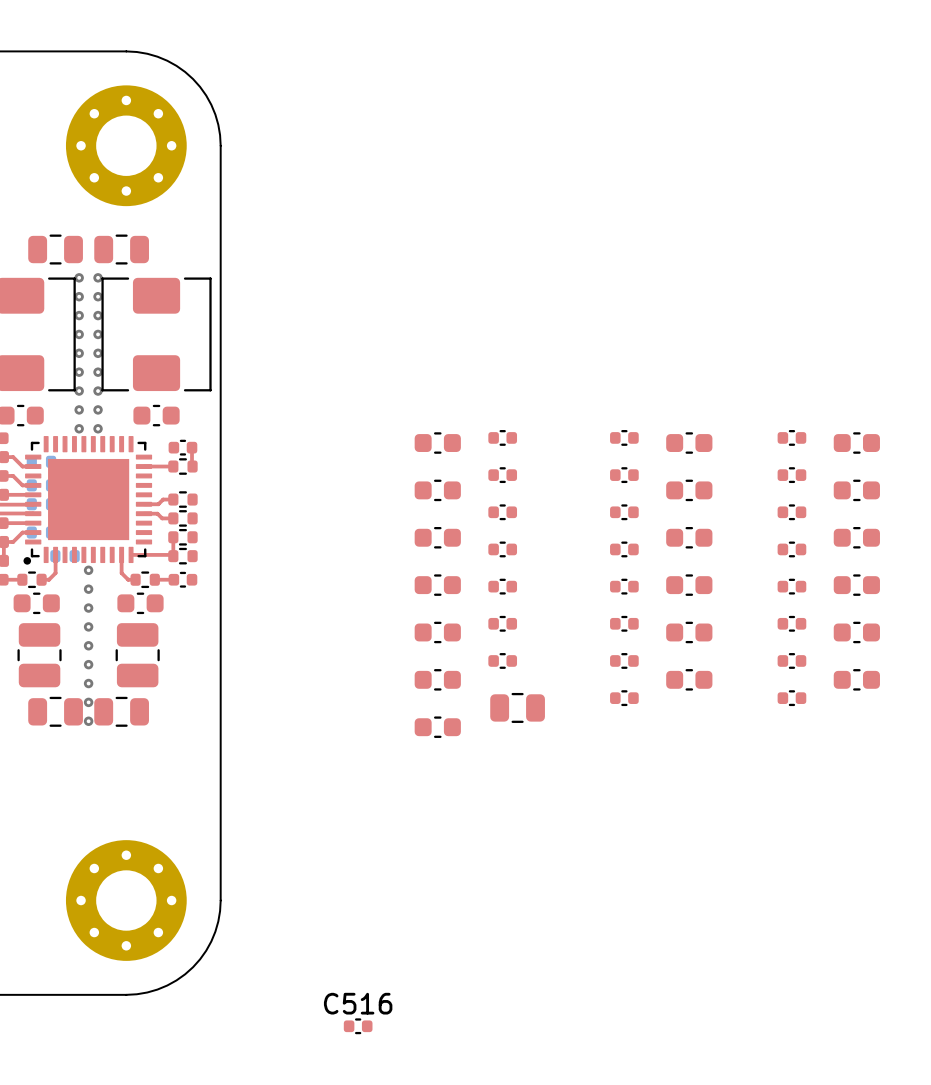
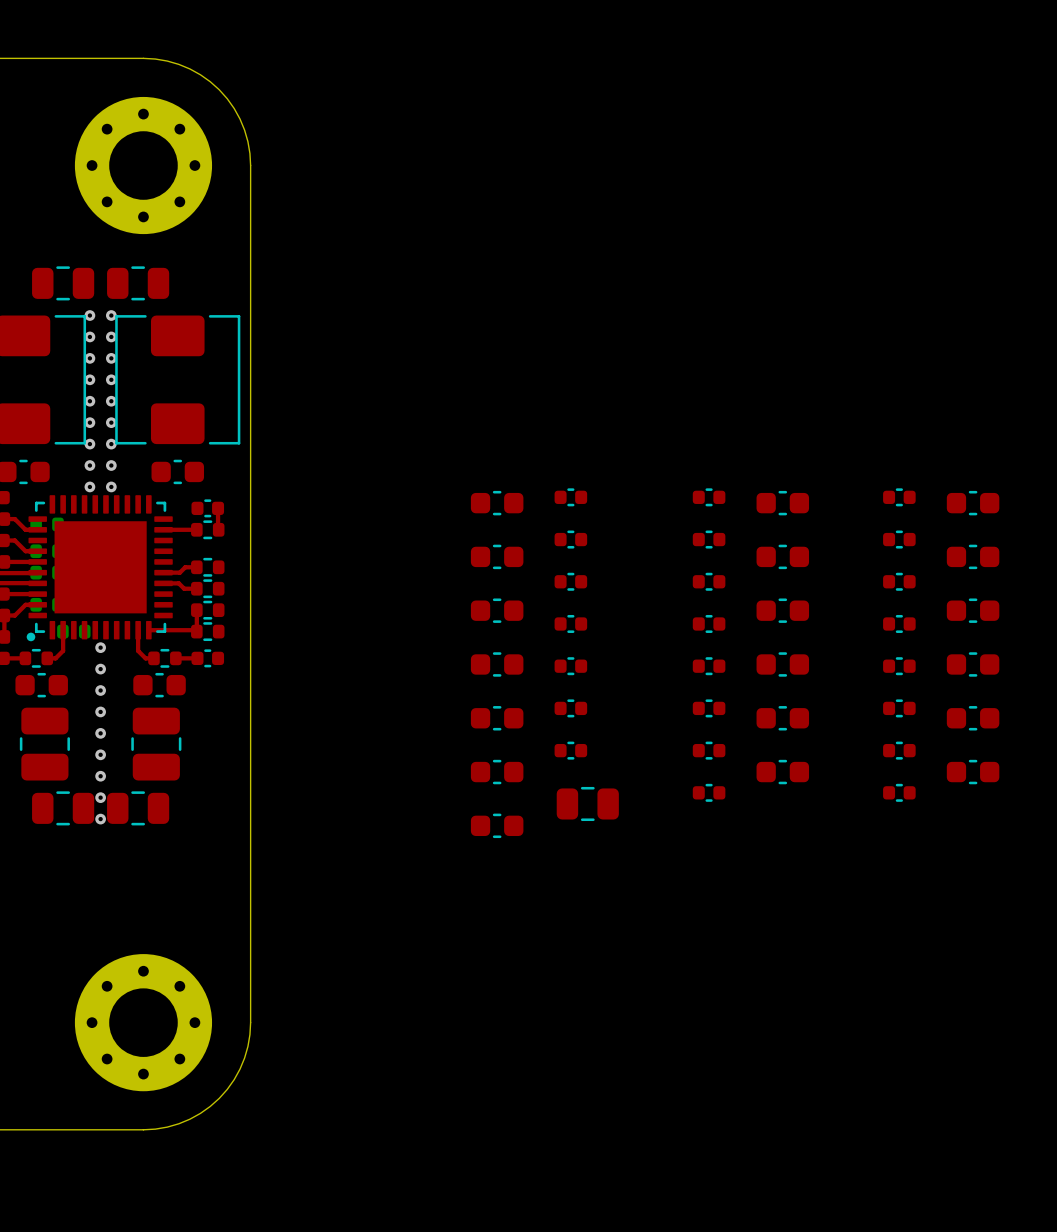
C516: (358, 1026) -> none

